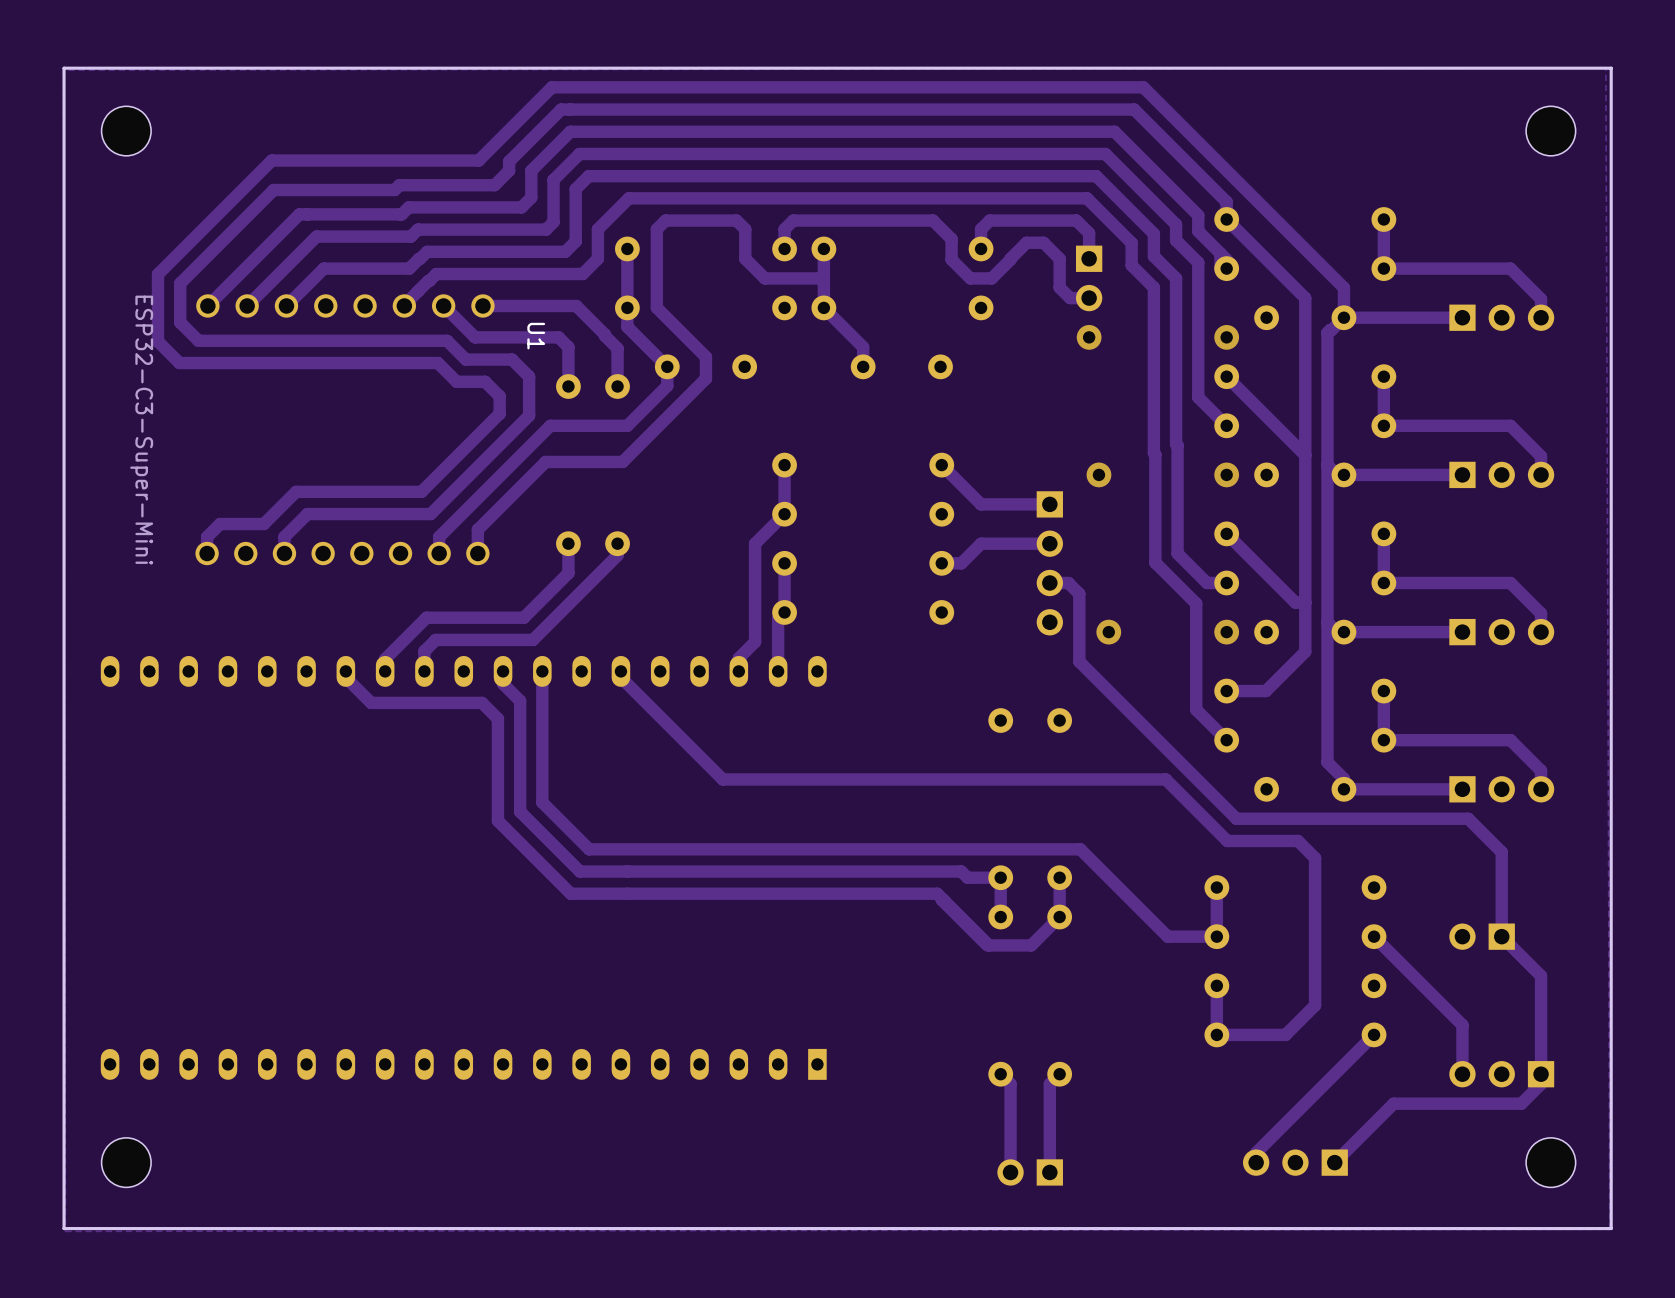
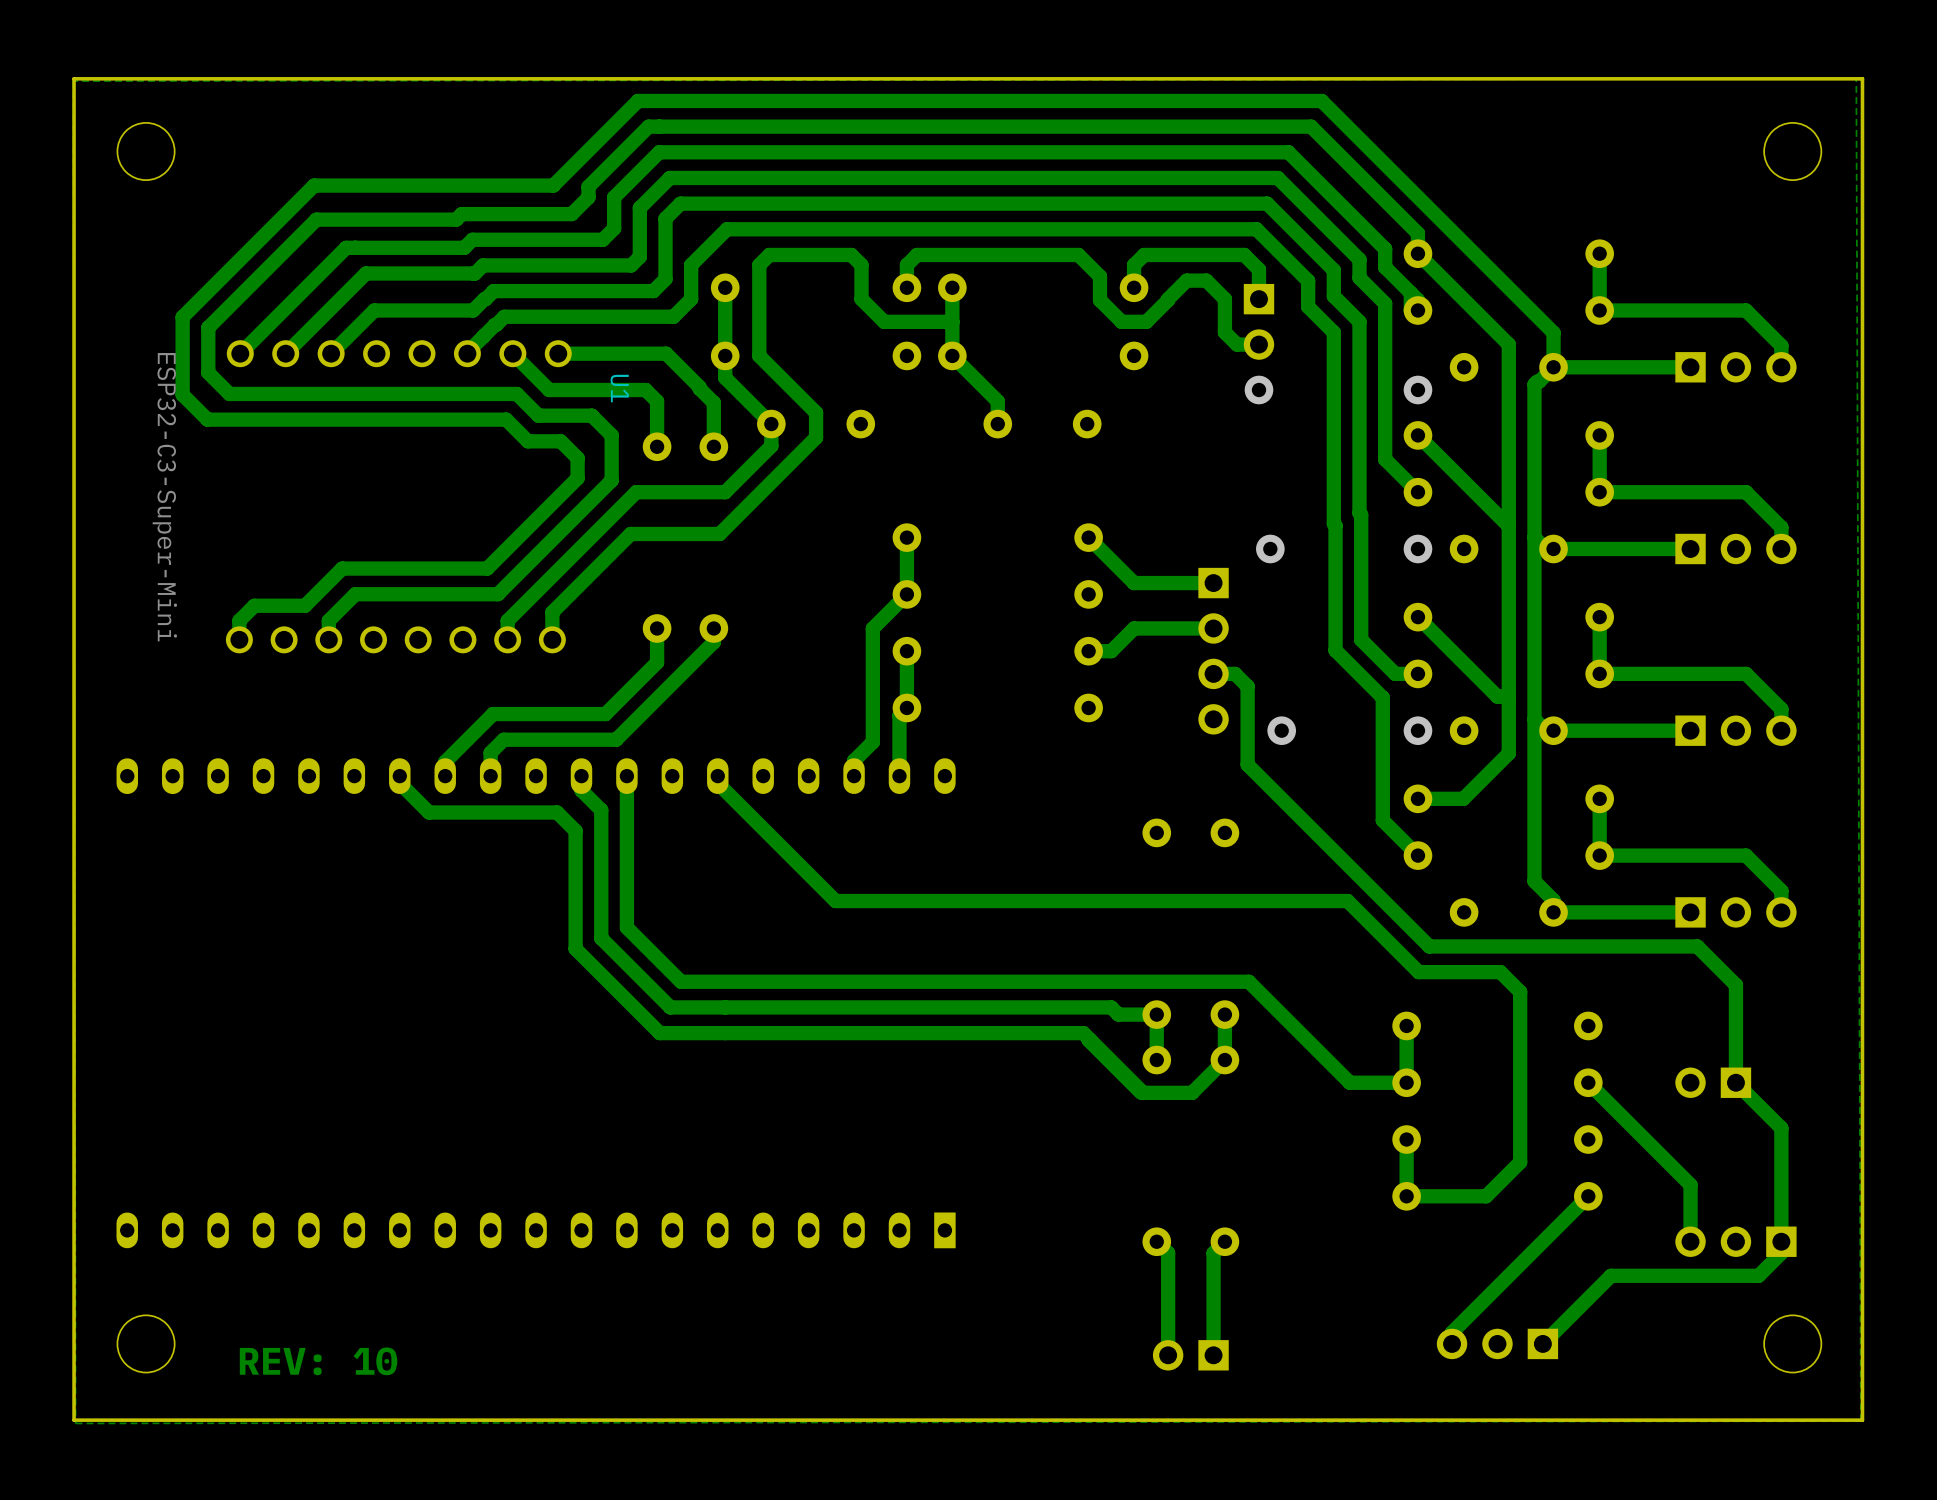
text: none -> REV: 10 (318, 1361)

